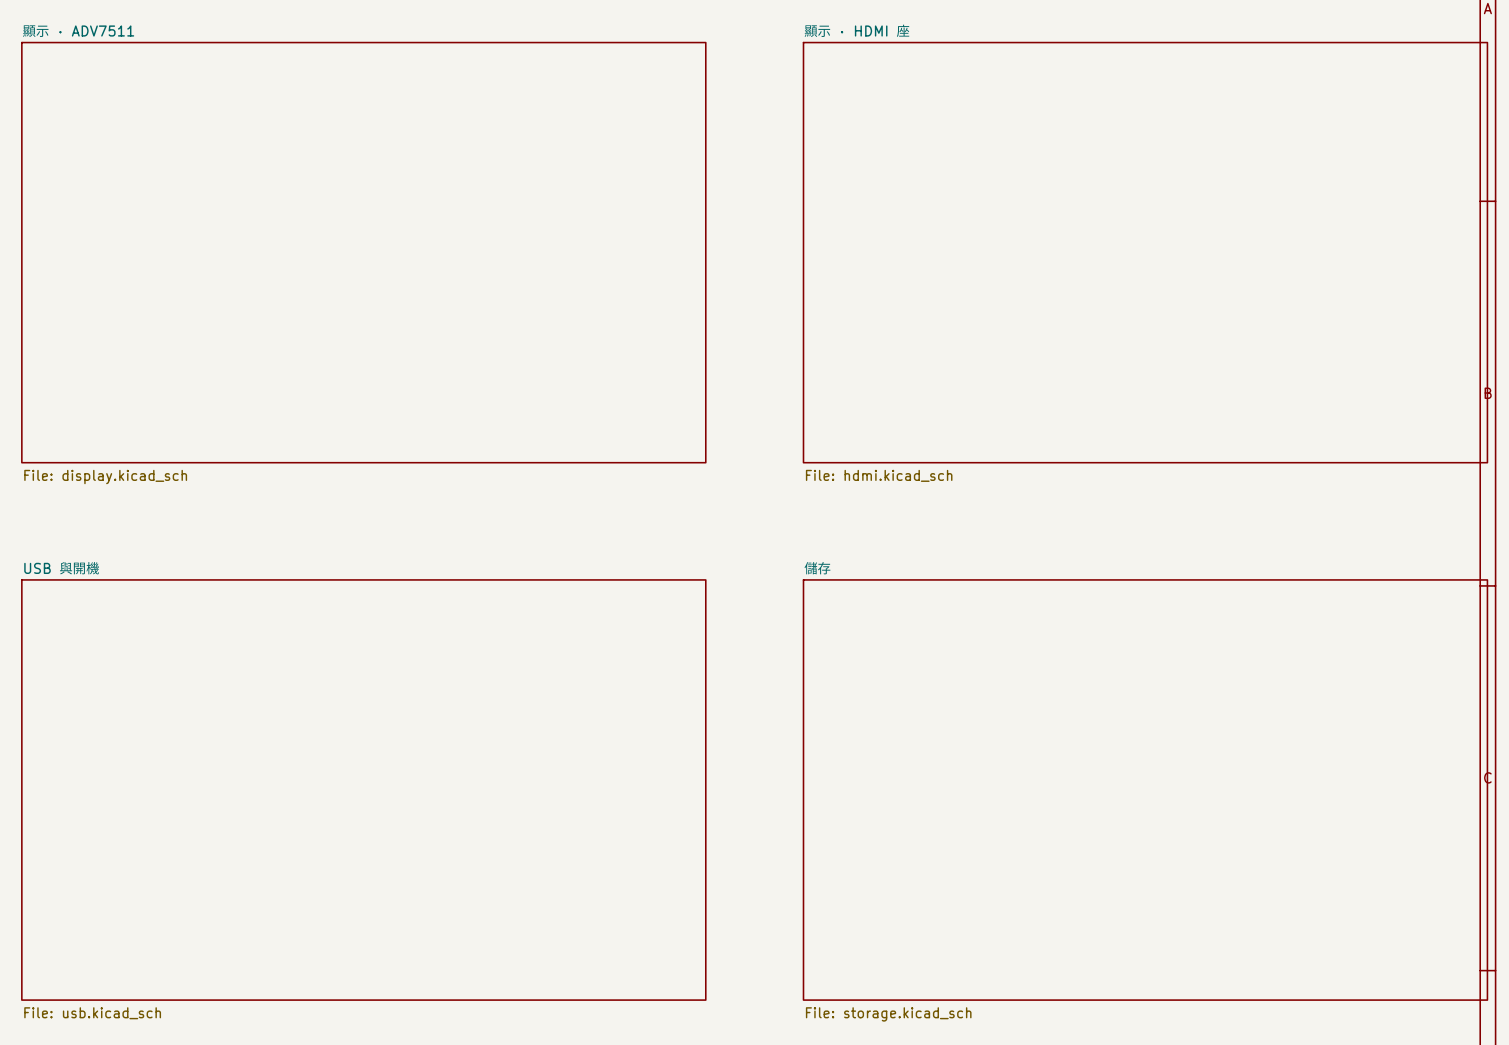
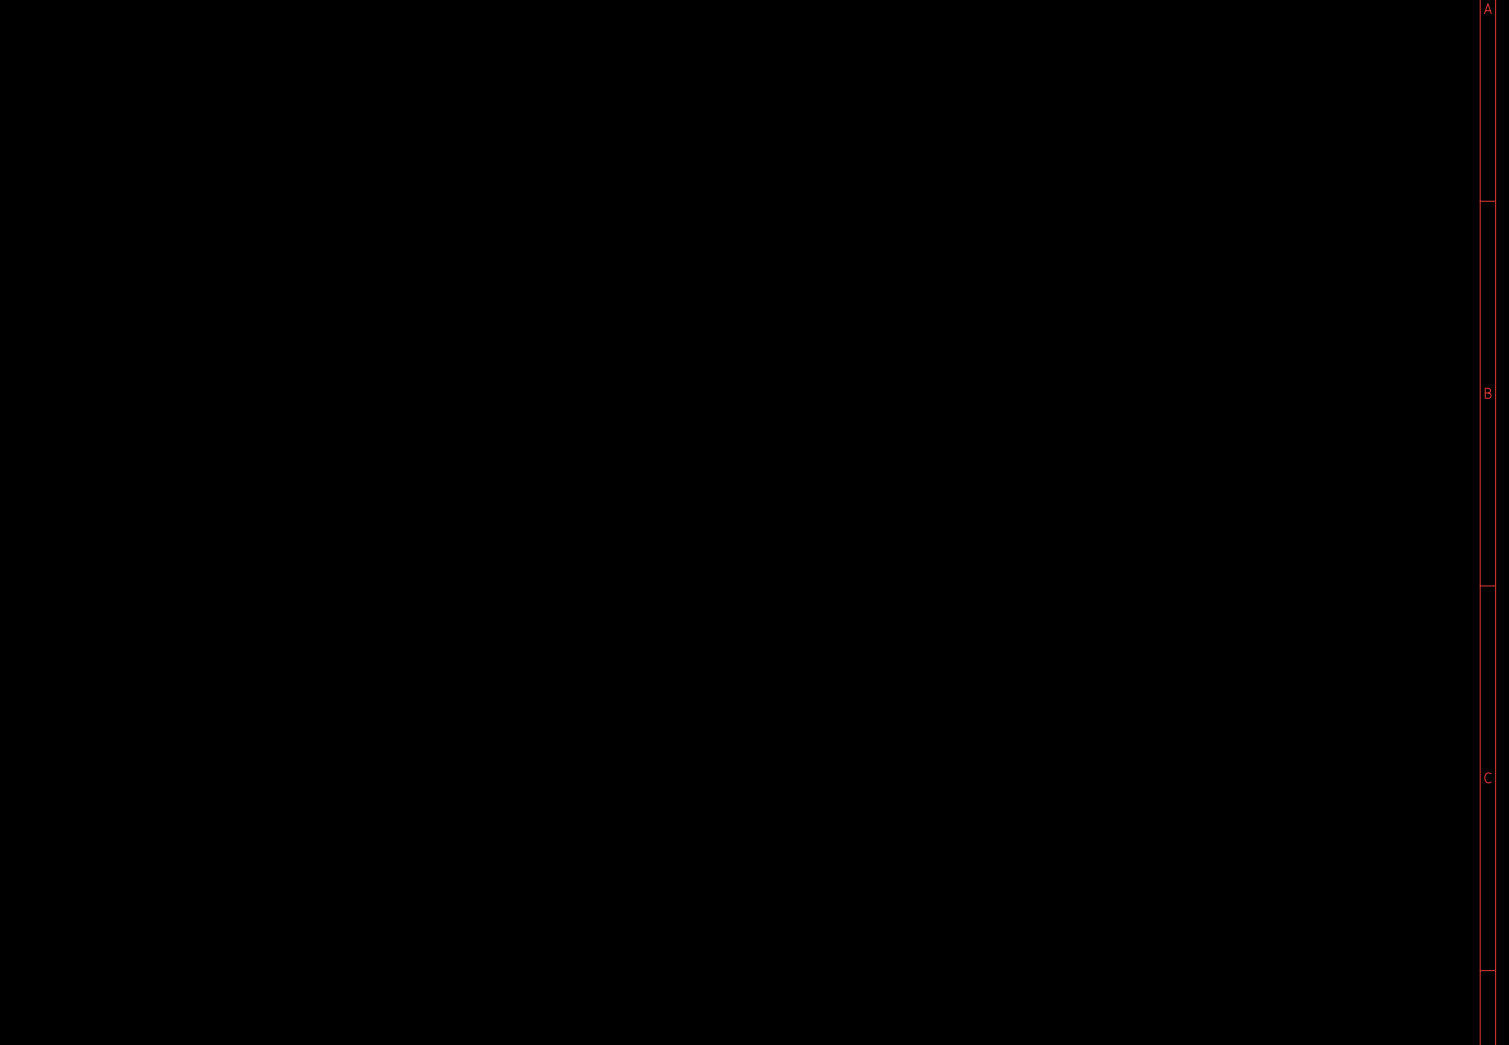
sheet 顯示 · ADV7511: File: display.kicad_sch (363, 252) -> none
sheet 顯示 · HDMI 座: File: hdmi.kicad_sch (1145, 252) -> none
sheet USB 與開機: File: usb.kicad_sch (363, 790) -> none
sheet 儲存: File: storage.kicad_sch (1145, 790) -> none

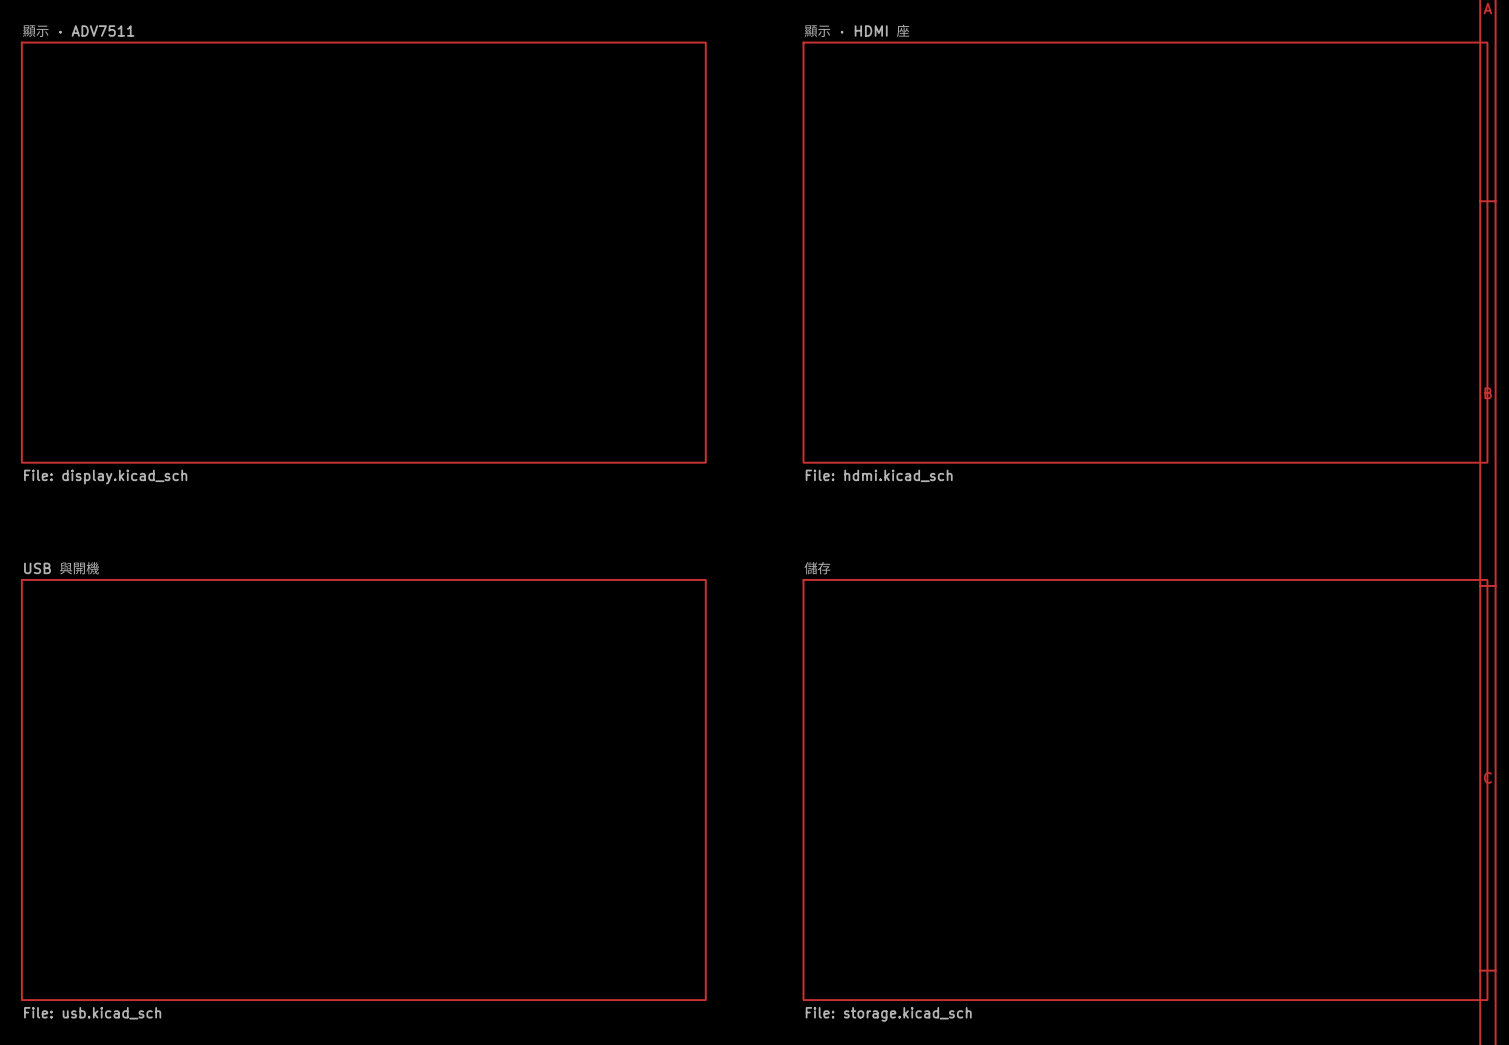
sheet 顯示 · ADV7511: none -> File: display.kicad_sch (363, 252)
sheet 顯示 · HDMI 座: none -> File: hdmi.kicad_sch (1145, 252)
sheet USB 與開機: none -> File: usb.kicad_sch (363, 790)
sheet 儲存: none -> File: storage.kicad_sch (1145, 790)

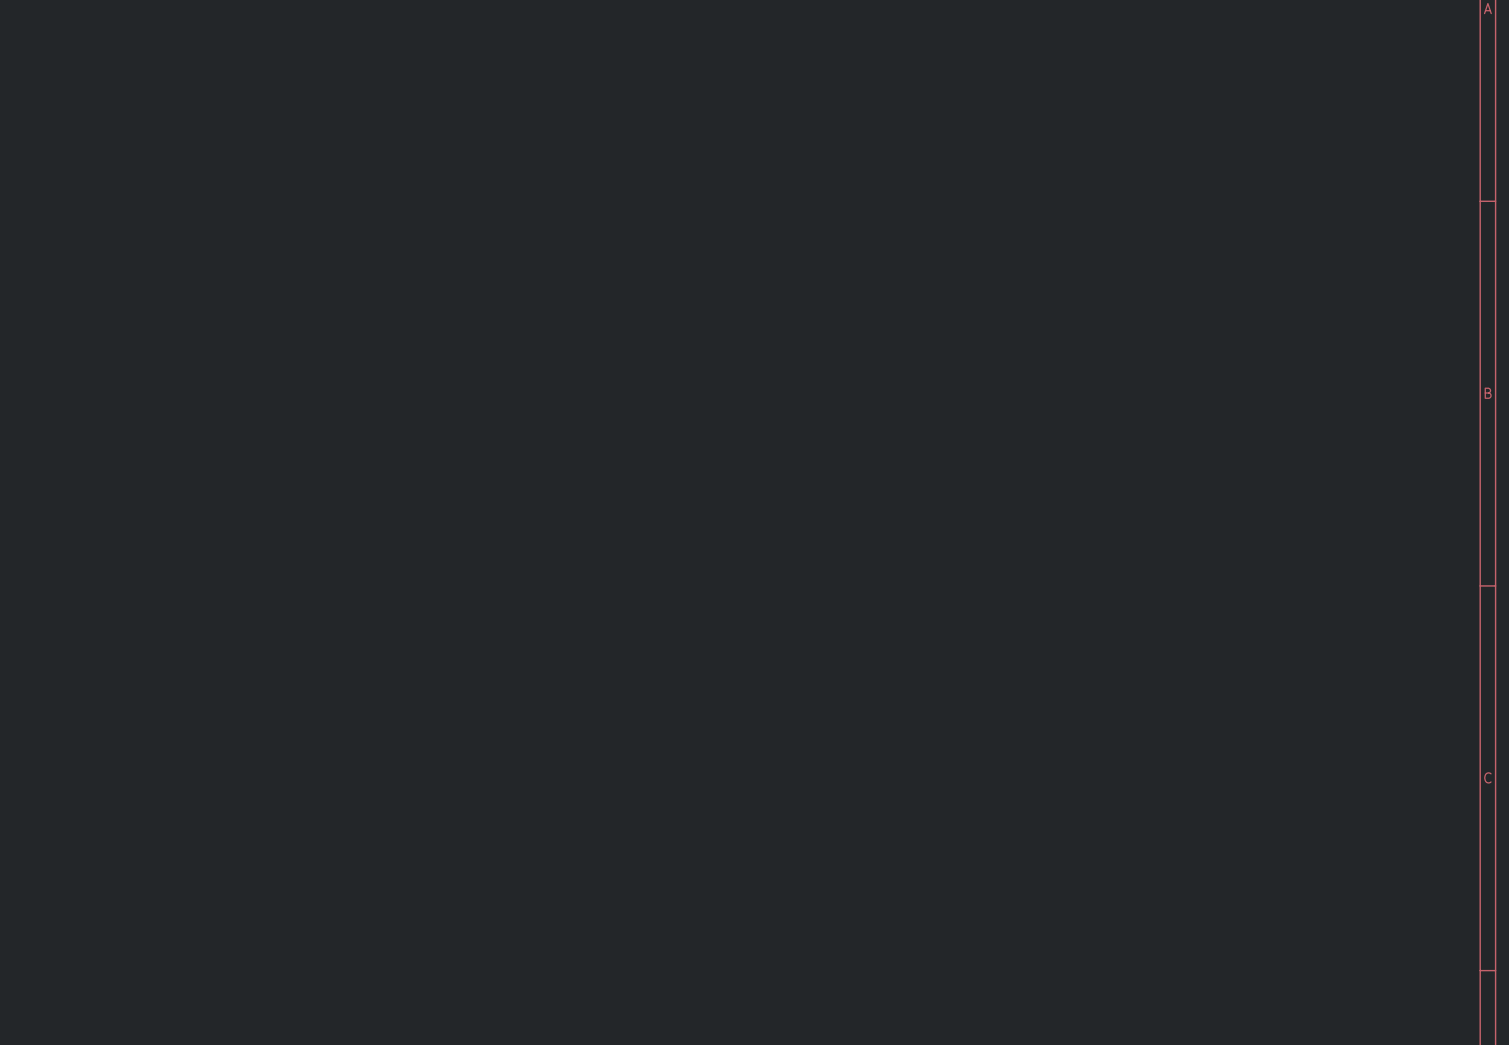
sheet 顯示 · ADV7511: File: display.kicad_sch (363, 252) -> none
sheet 顯示 · HDMI 座: File: hdmi.kicad_sch (1145, 252) -> none
sheet USB 與開機: File: usb.kicad_sch (363, 790) -> none
sheet 儲存: File: storage.kicad_sch (1145, 790) -> none

